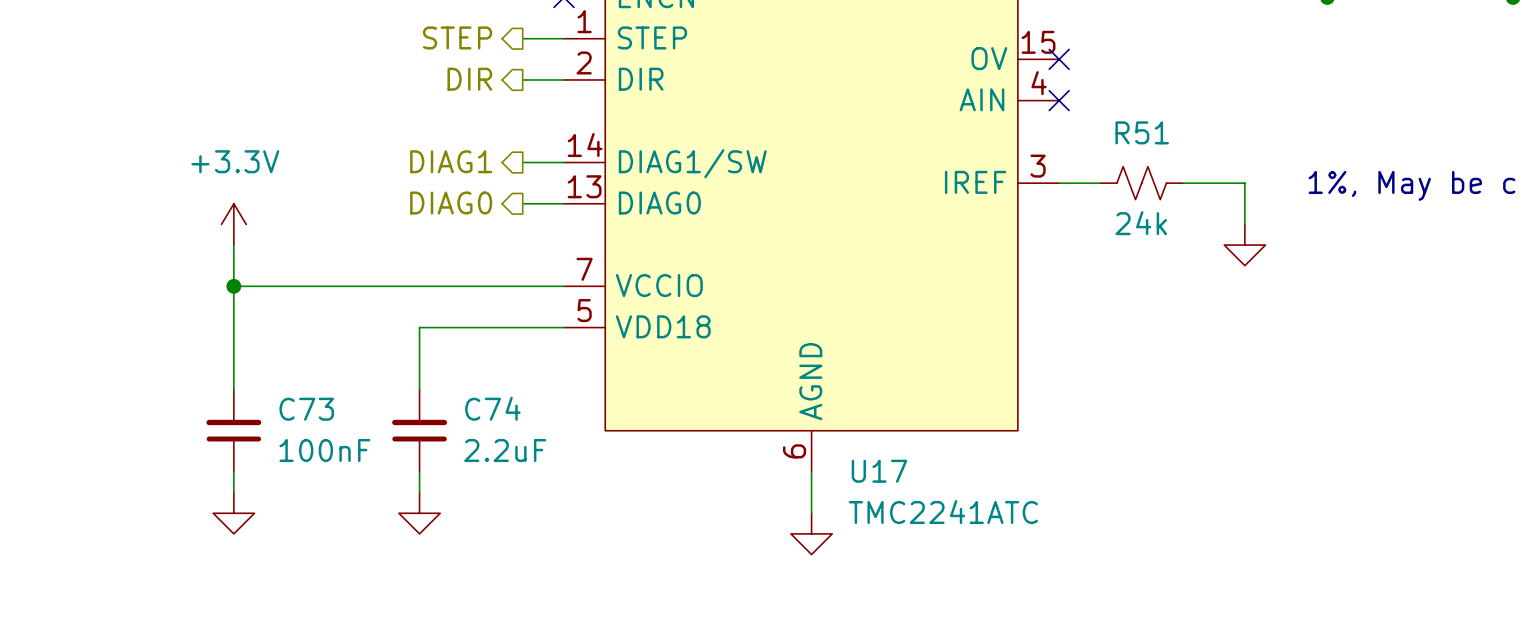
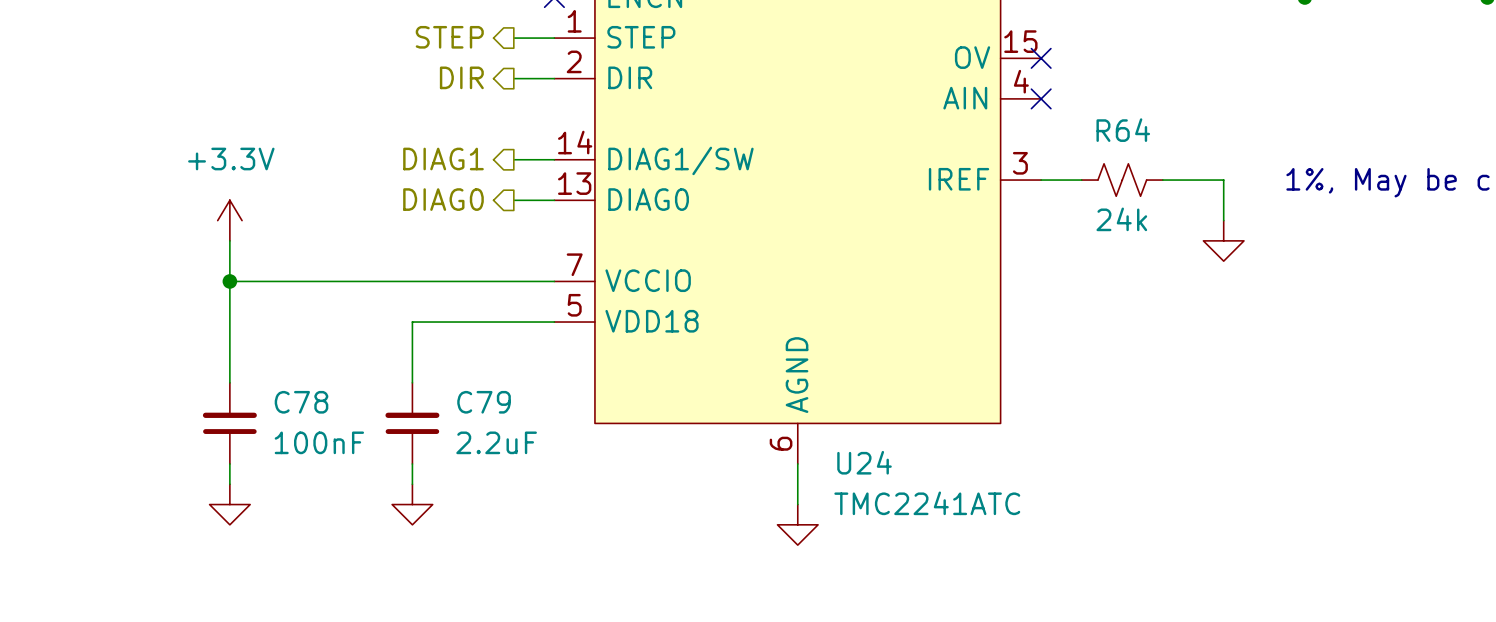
R51 name: R51 (1142, 132) -> R64 (1123, 130)
C74 name: C74 (492, 408) -> C79 (484, 402)
C73 name: C73 (306, 409) -> C78 (301, 402)
U17 name: U17 (879, 471) -> U24 (864, 462)

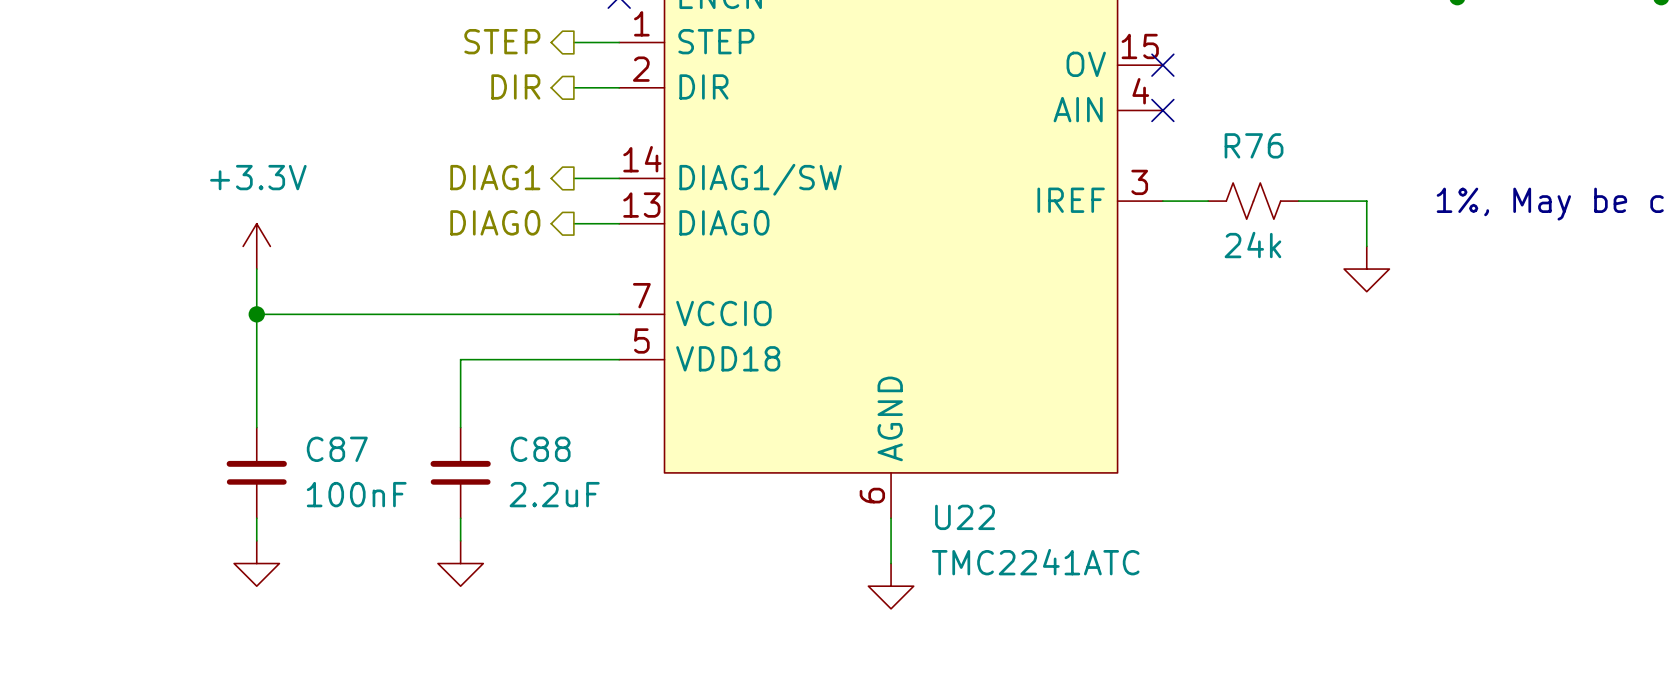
R64 name: R64 (1123, 130) -> R76 (1254, 145)
C78 name: C78 (301, 402) -> C87 (337, 449)
C79 name: C79 (484, 402) -> C88 (540, 449)
U24 name: U24 (864, 462) -> U22 (965, 517)

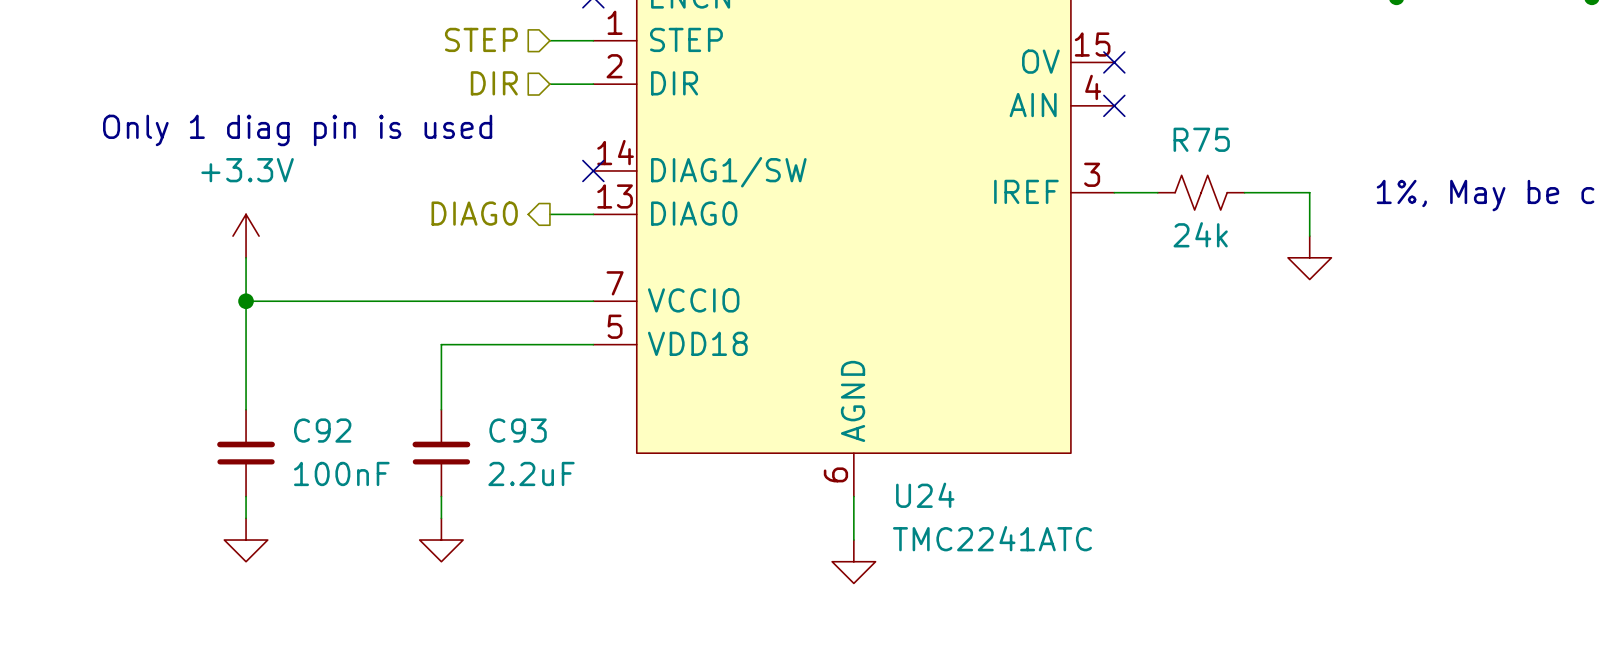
hierarchical label shape: output (502, 41) -> input (481, 39)
hierarchical label shape: output (515, 86) -> input (494, 83)
text: none -> Only 1 diag pin is used (297, 130)
R76 name: R76 (1254, 145) -> R75 (1201, 139)
hierarchical label: DIAG1 (495, 177) -> none
wire: (573, 178) (619, 178) -> none
no-connect mark: none -> (593, 170)
C87 name: C87 (337, 449) -> C92 (322, 430)
C88 name: C88 (540, 449) -> C93 (518, 430)
U22 name: U22 (965, 517) -> U24 (925, 495)

